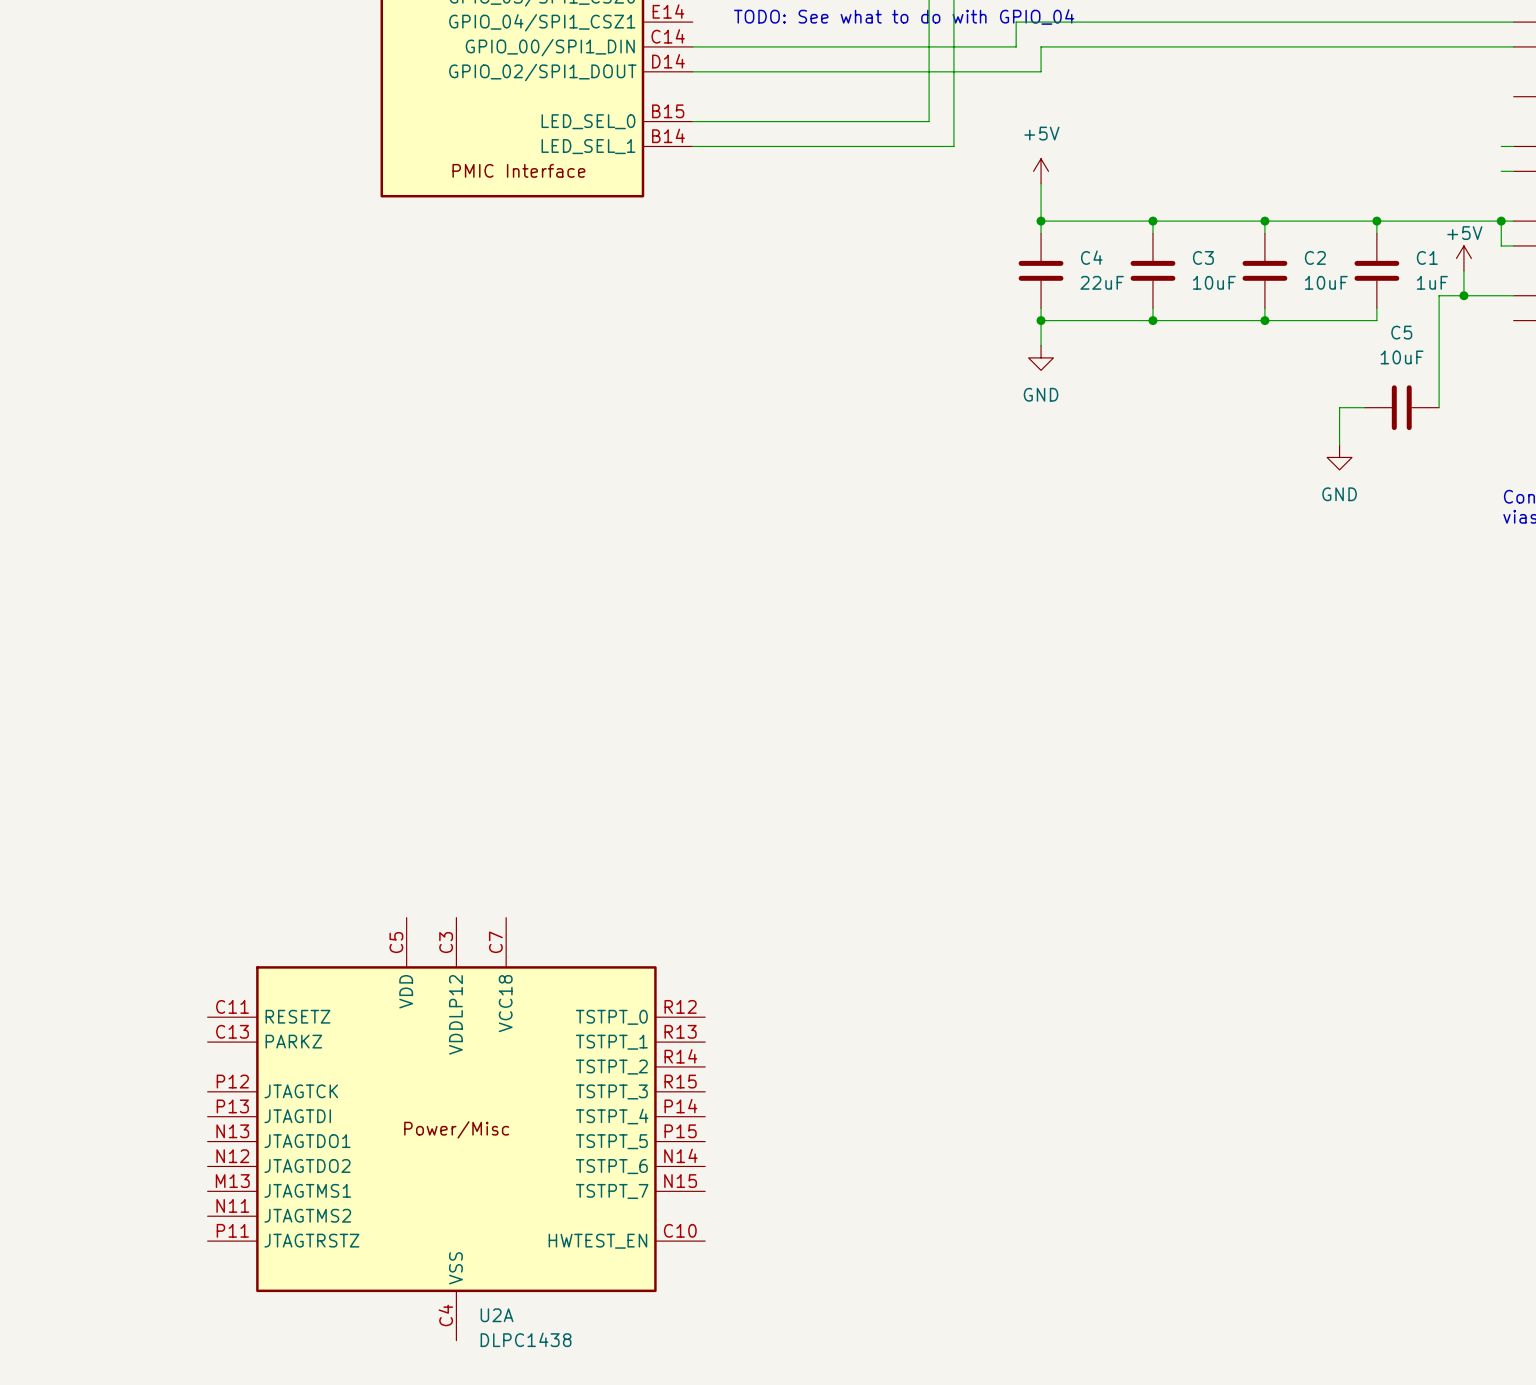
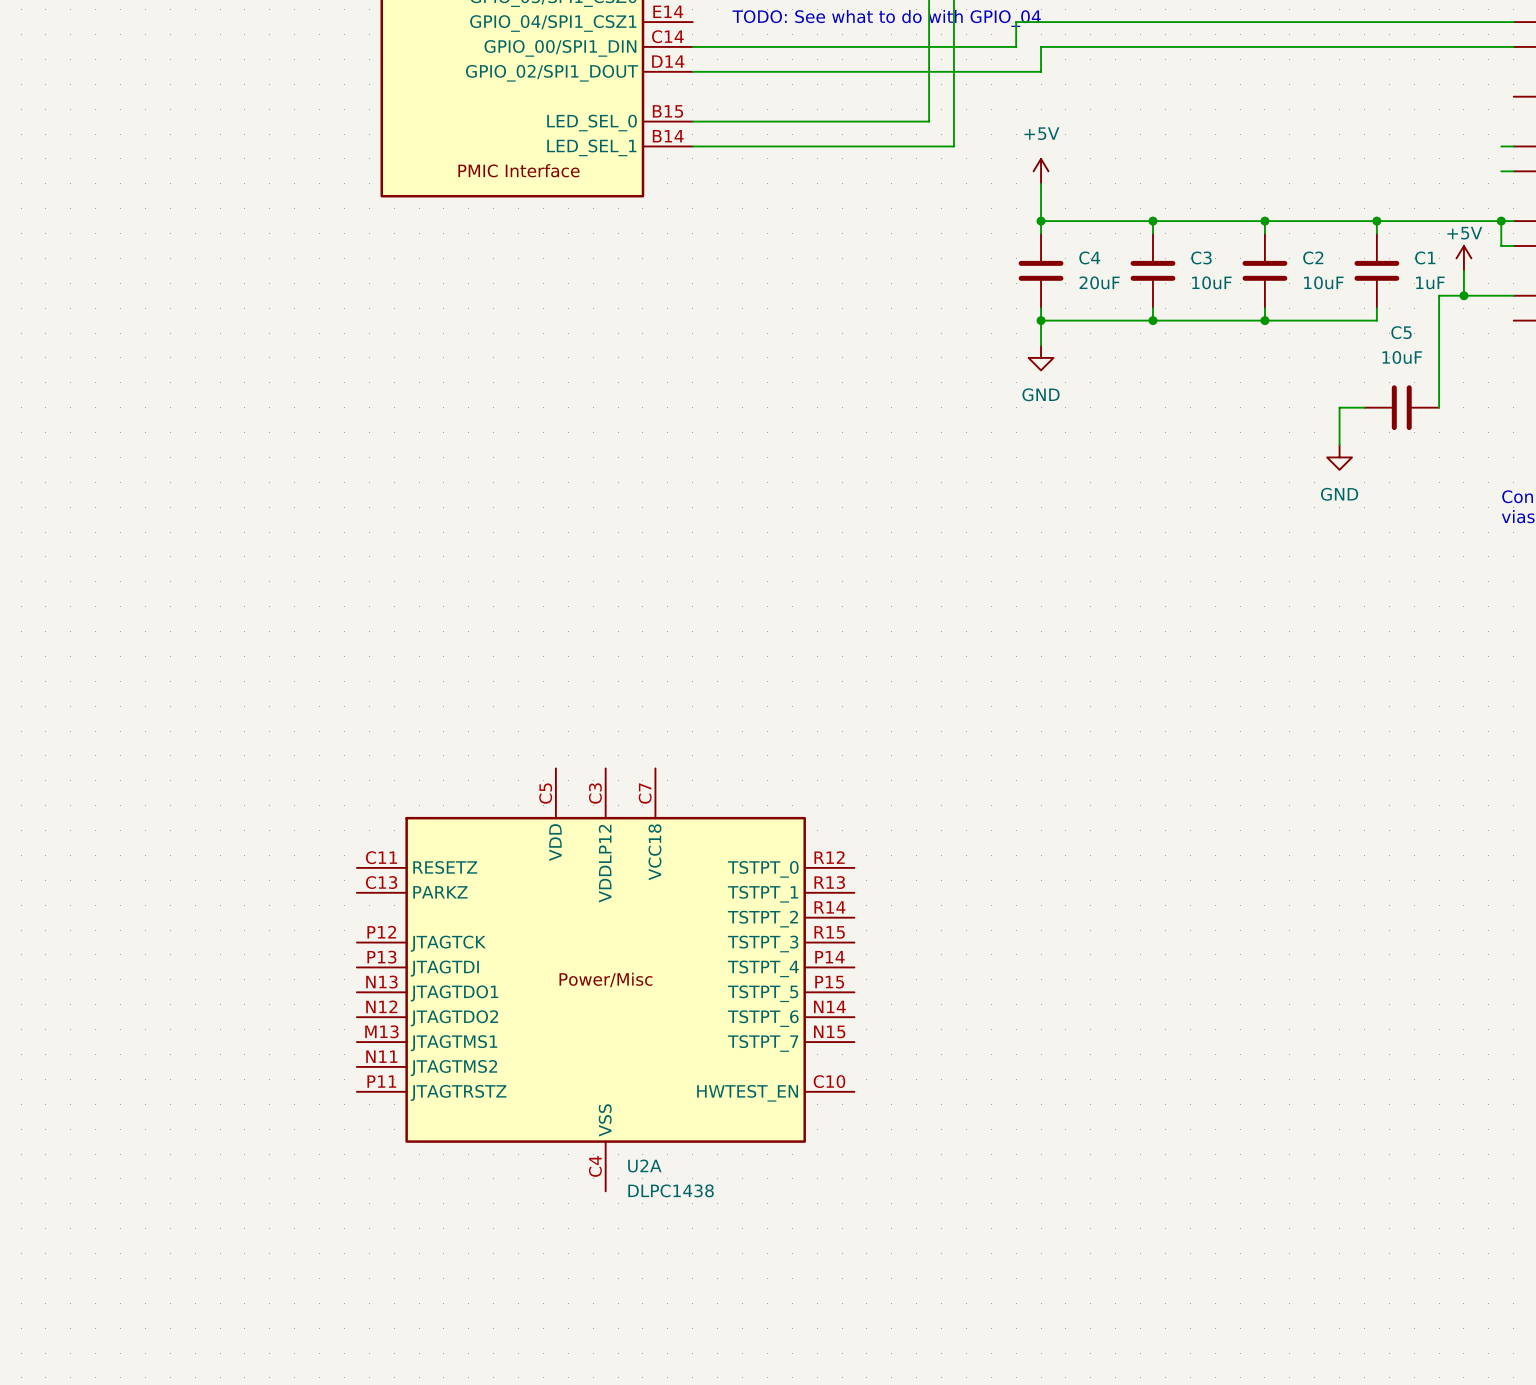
C4 value: 22uF (1102, 282) -> 20uF (1099, 282)
U2A position: (456, 1129) -> (605, 979)

